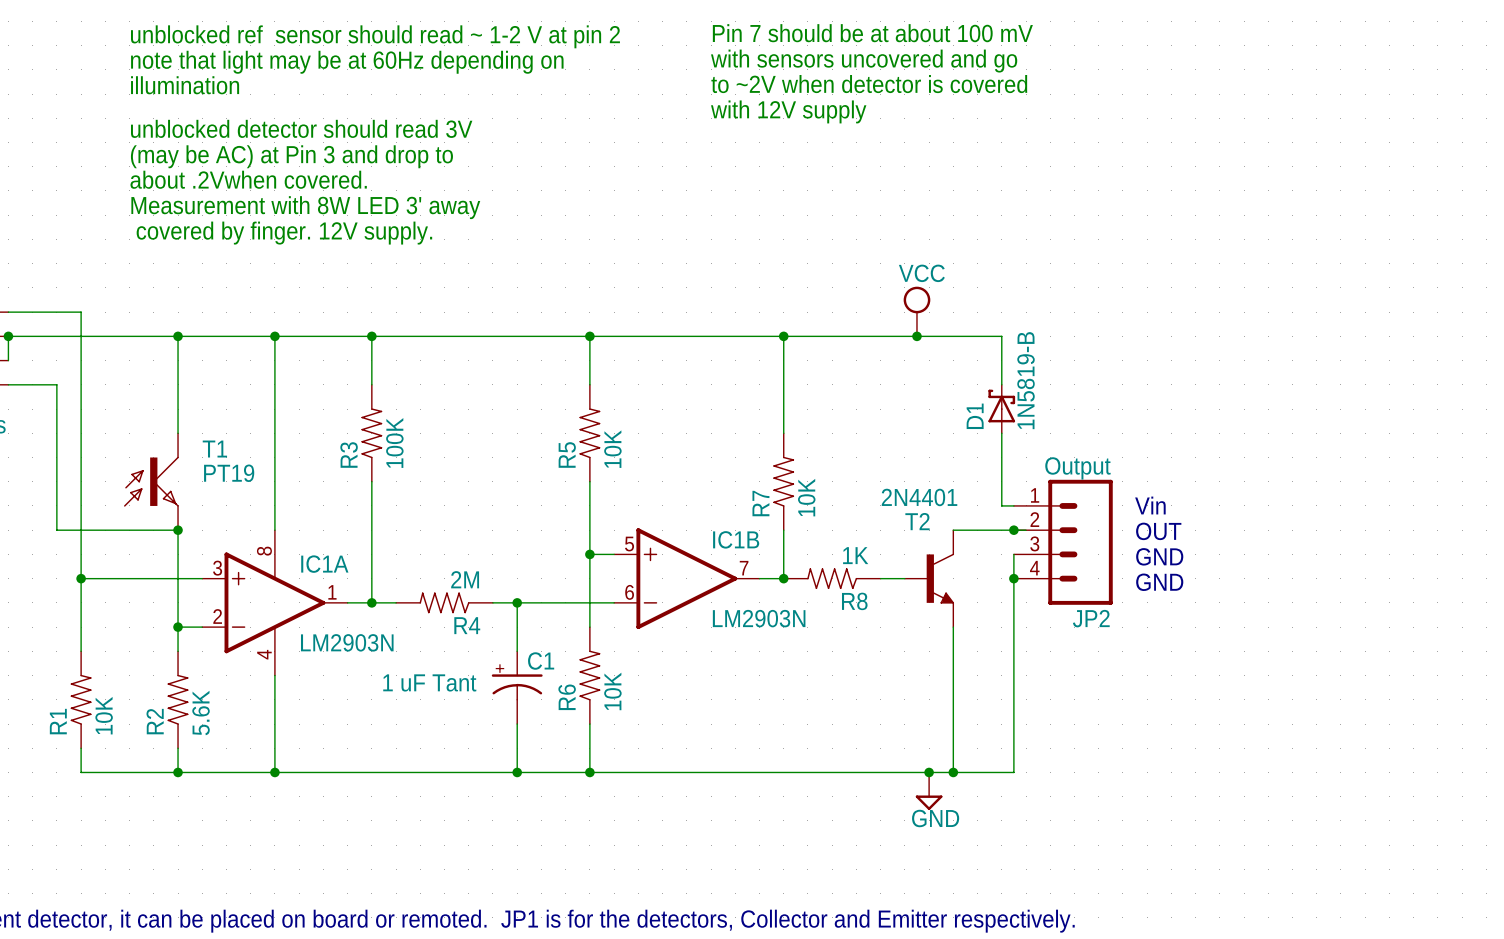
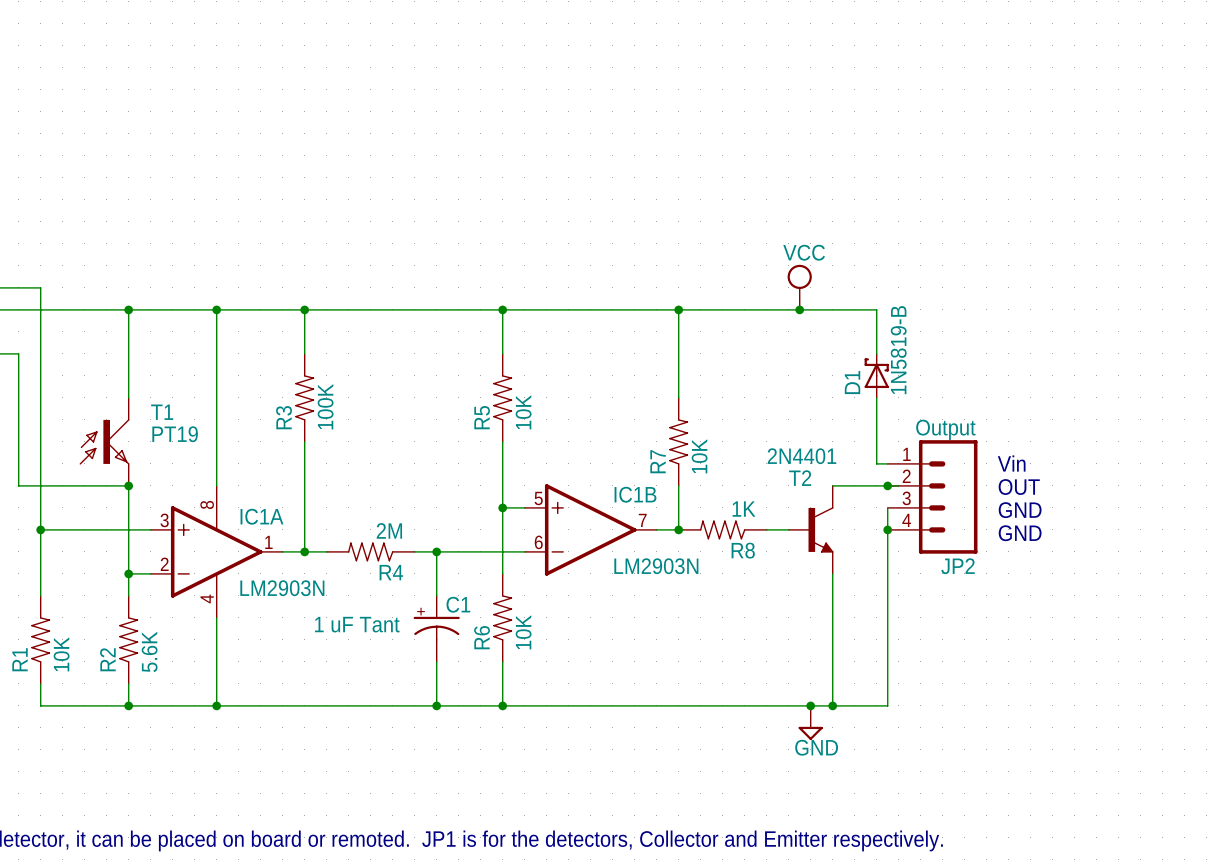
text: Pin 7 should be at about 100 mV (872, 33) -> none
text: unblocked ref sensor should read ~ 1-2 V at pin 2 (375, 36) -> none
text: with sensors uncovered and go (864, 61) -> none
text: note that light may be at 60Hz depending on (347, 62) -> none
text: to ~2V when detector is covered (869, 84) -> none
text: illumination (185, 85) -> none
text: with 12V supply (788, 111) -> none
text: unblocked detector should read 3V (301, 128) -> none
text: (may be AC) at Pin 3 and drop to (291, 156) -> none
text: about .2Vwhen covered. (248, 179) -> none
text: Measurement with 8W LED 3' away (305, 207) -> none
text: covered by finger. 12V supply. (284, 233) -> none

